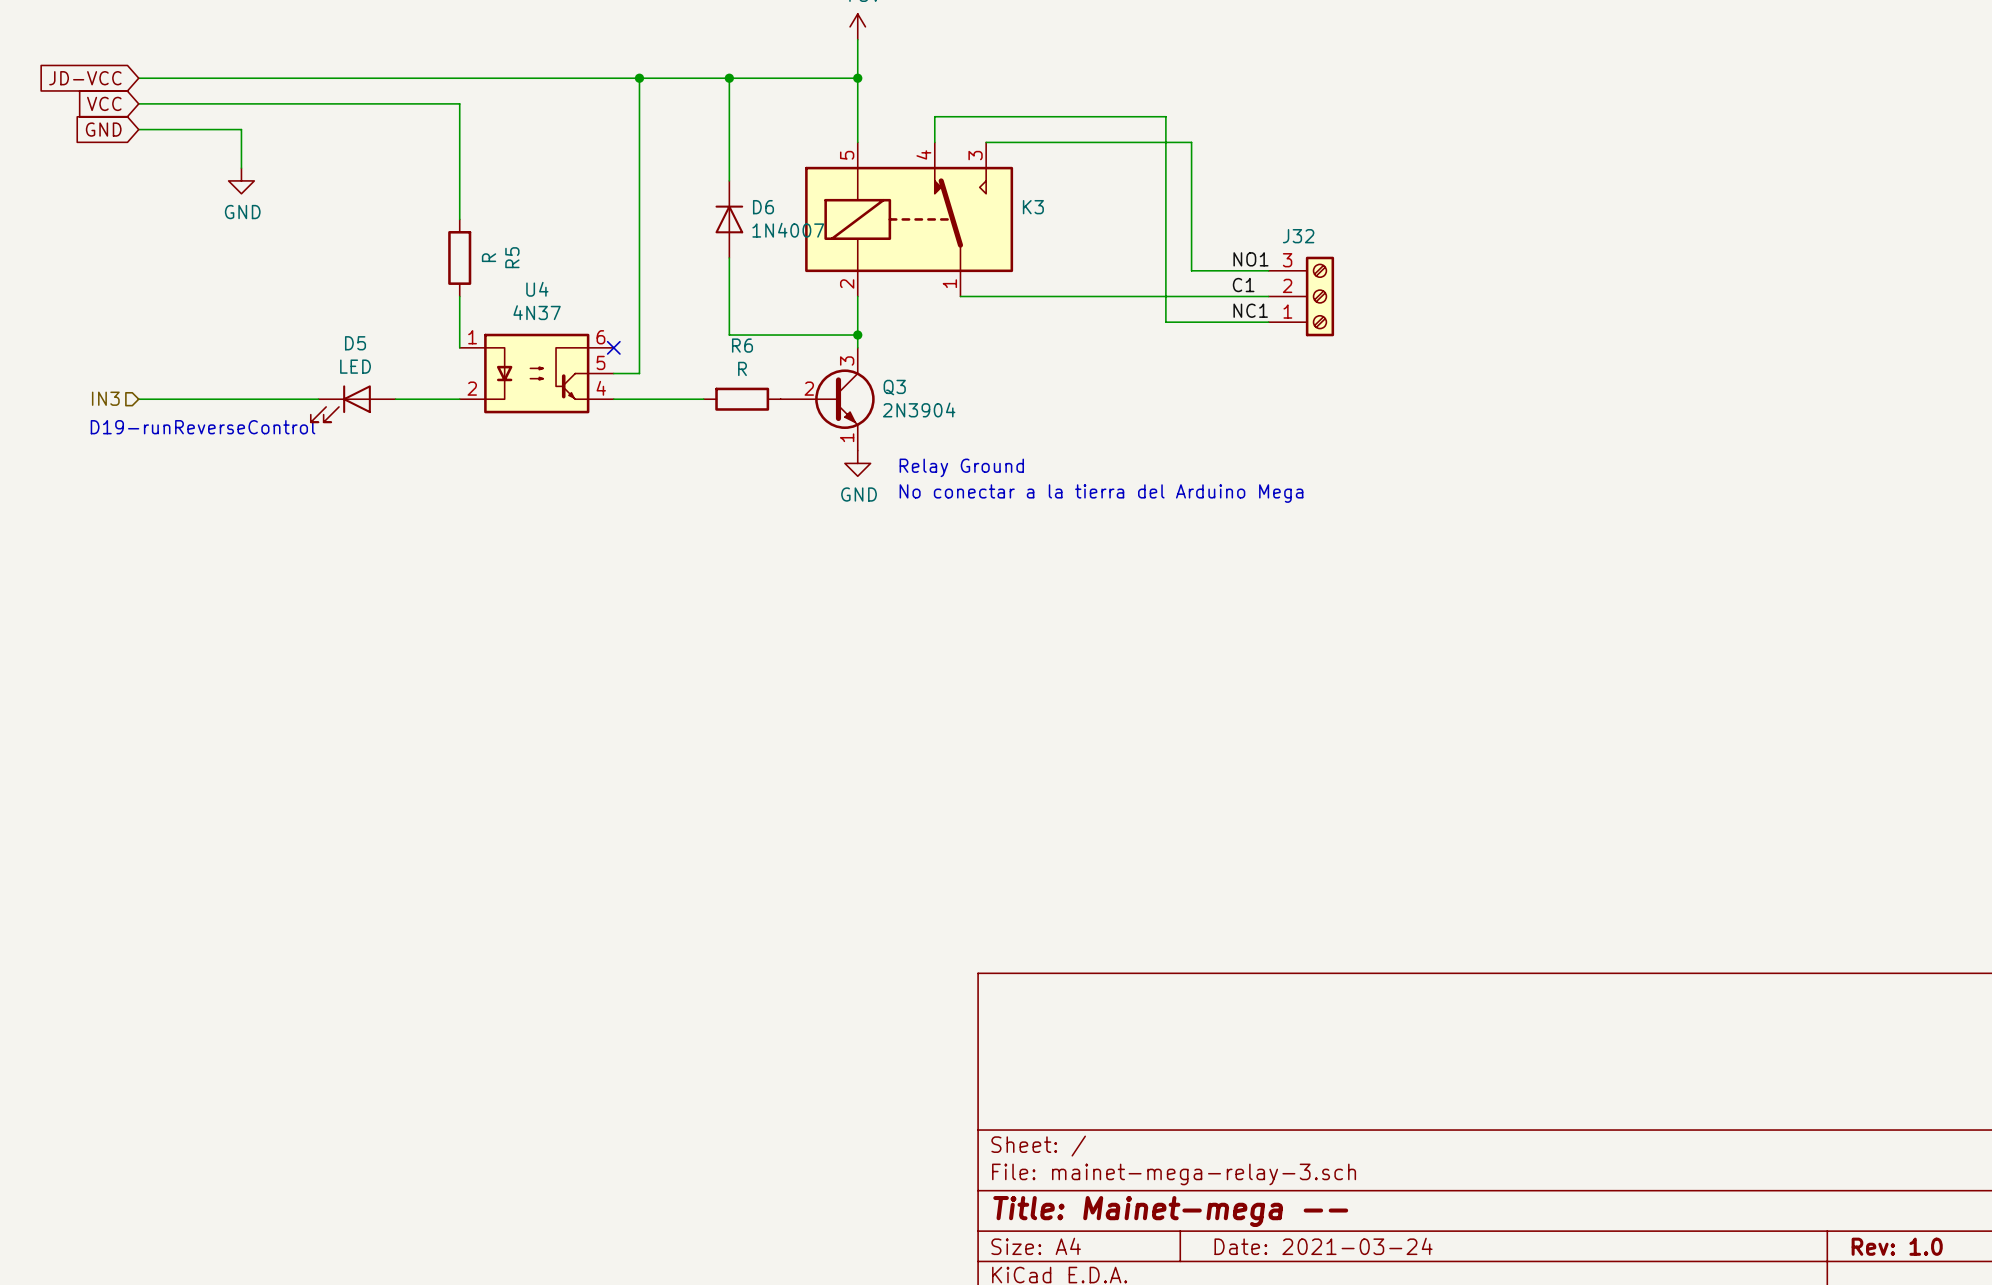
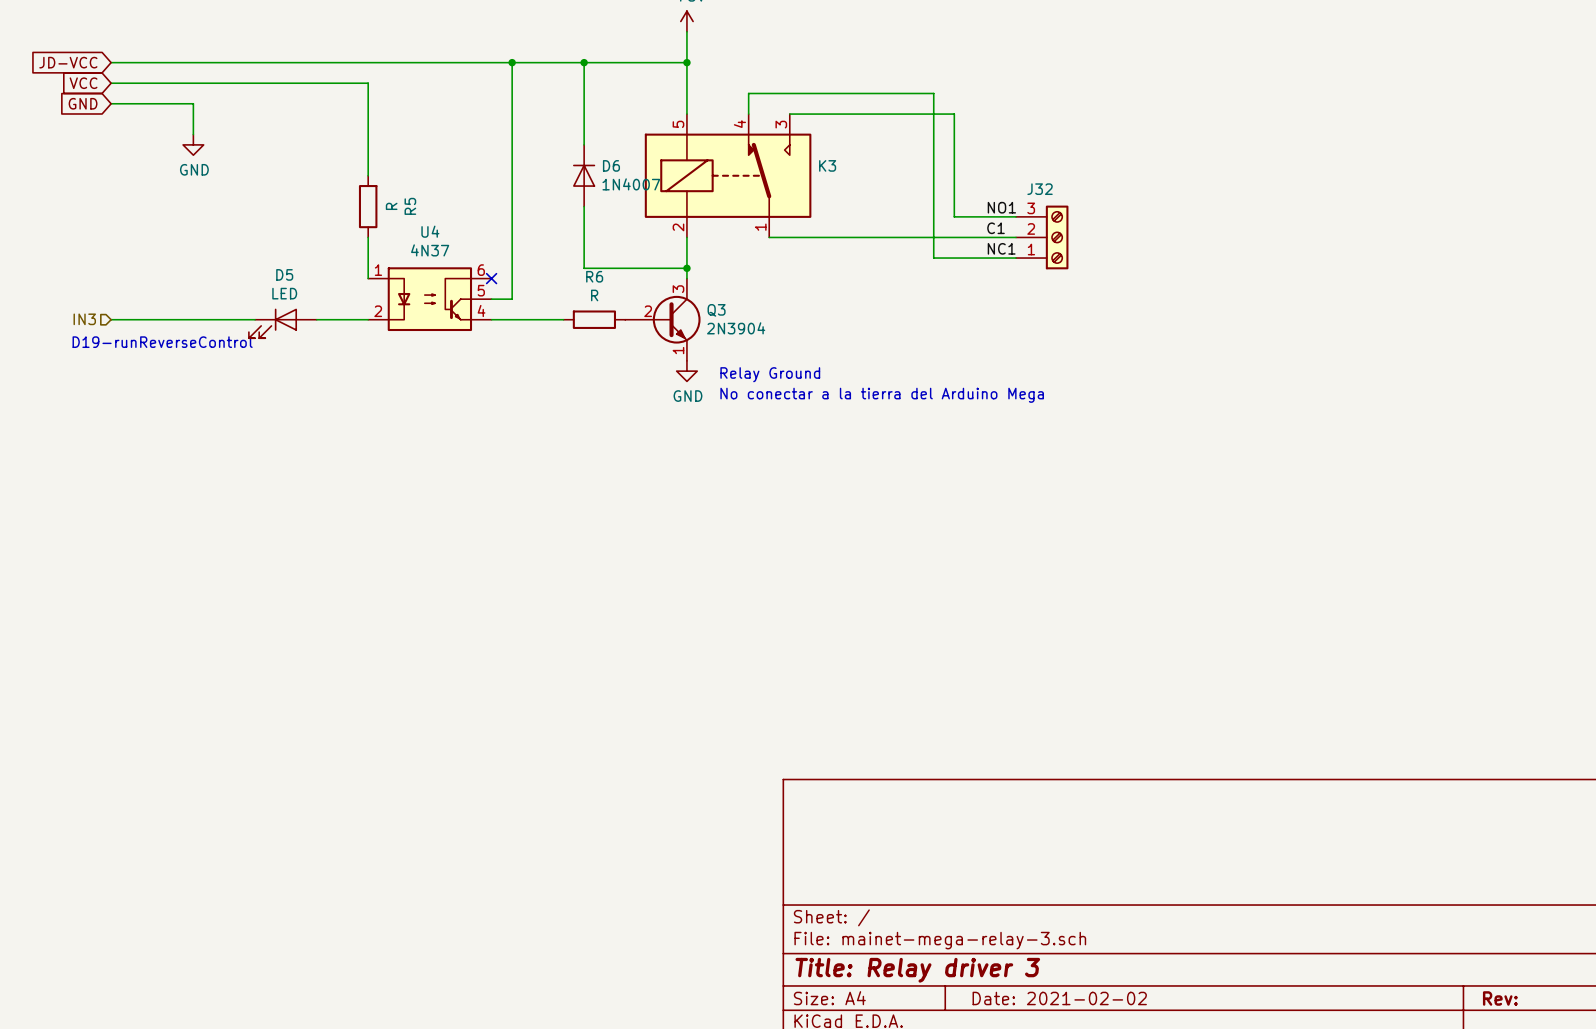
title block: Title: Mainet-mega -- (1170, 1211) -> Title: Relay driver 3 (917, 970)
title block: Date: 2021-03-24 (1323, 1246) -> Date: 2021-02-02 (1059, 998)
title block: Rev: 1.0 (1897, 1246) -> Rev: (1500, 998)

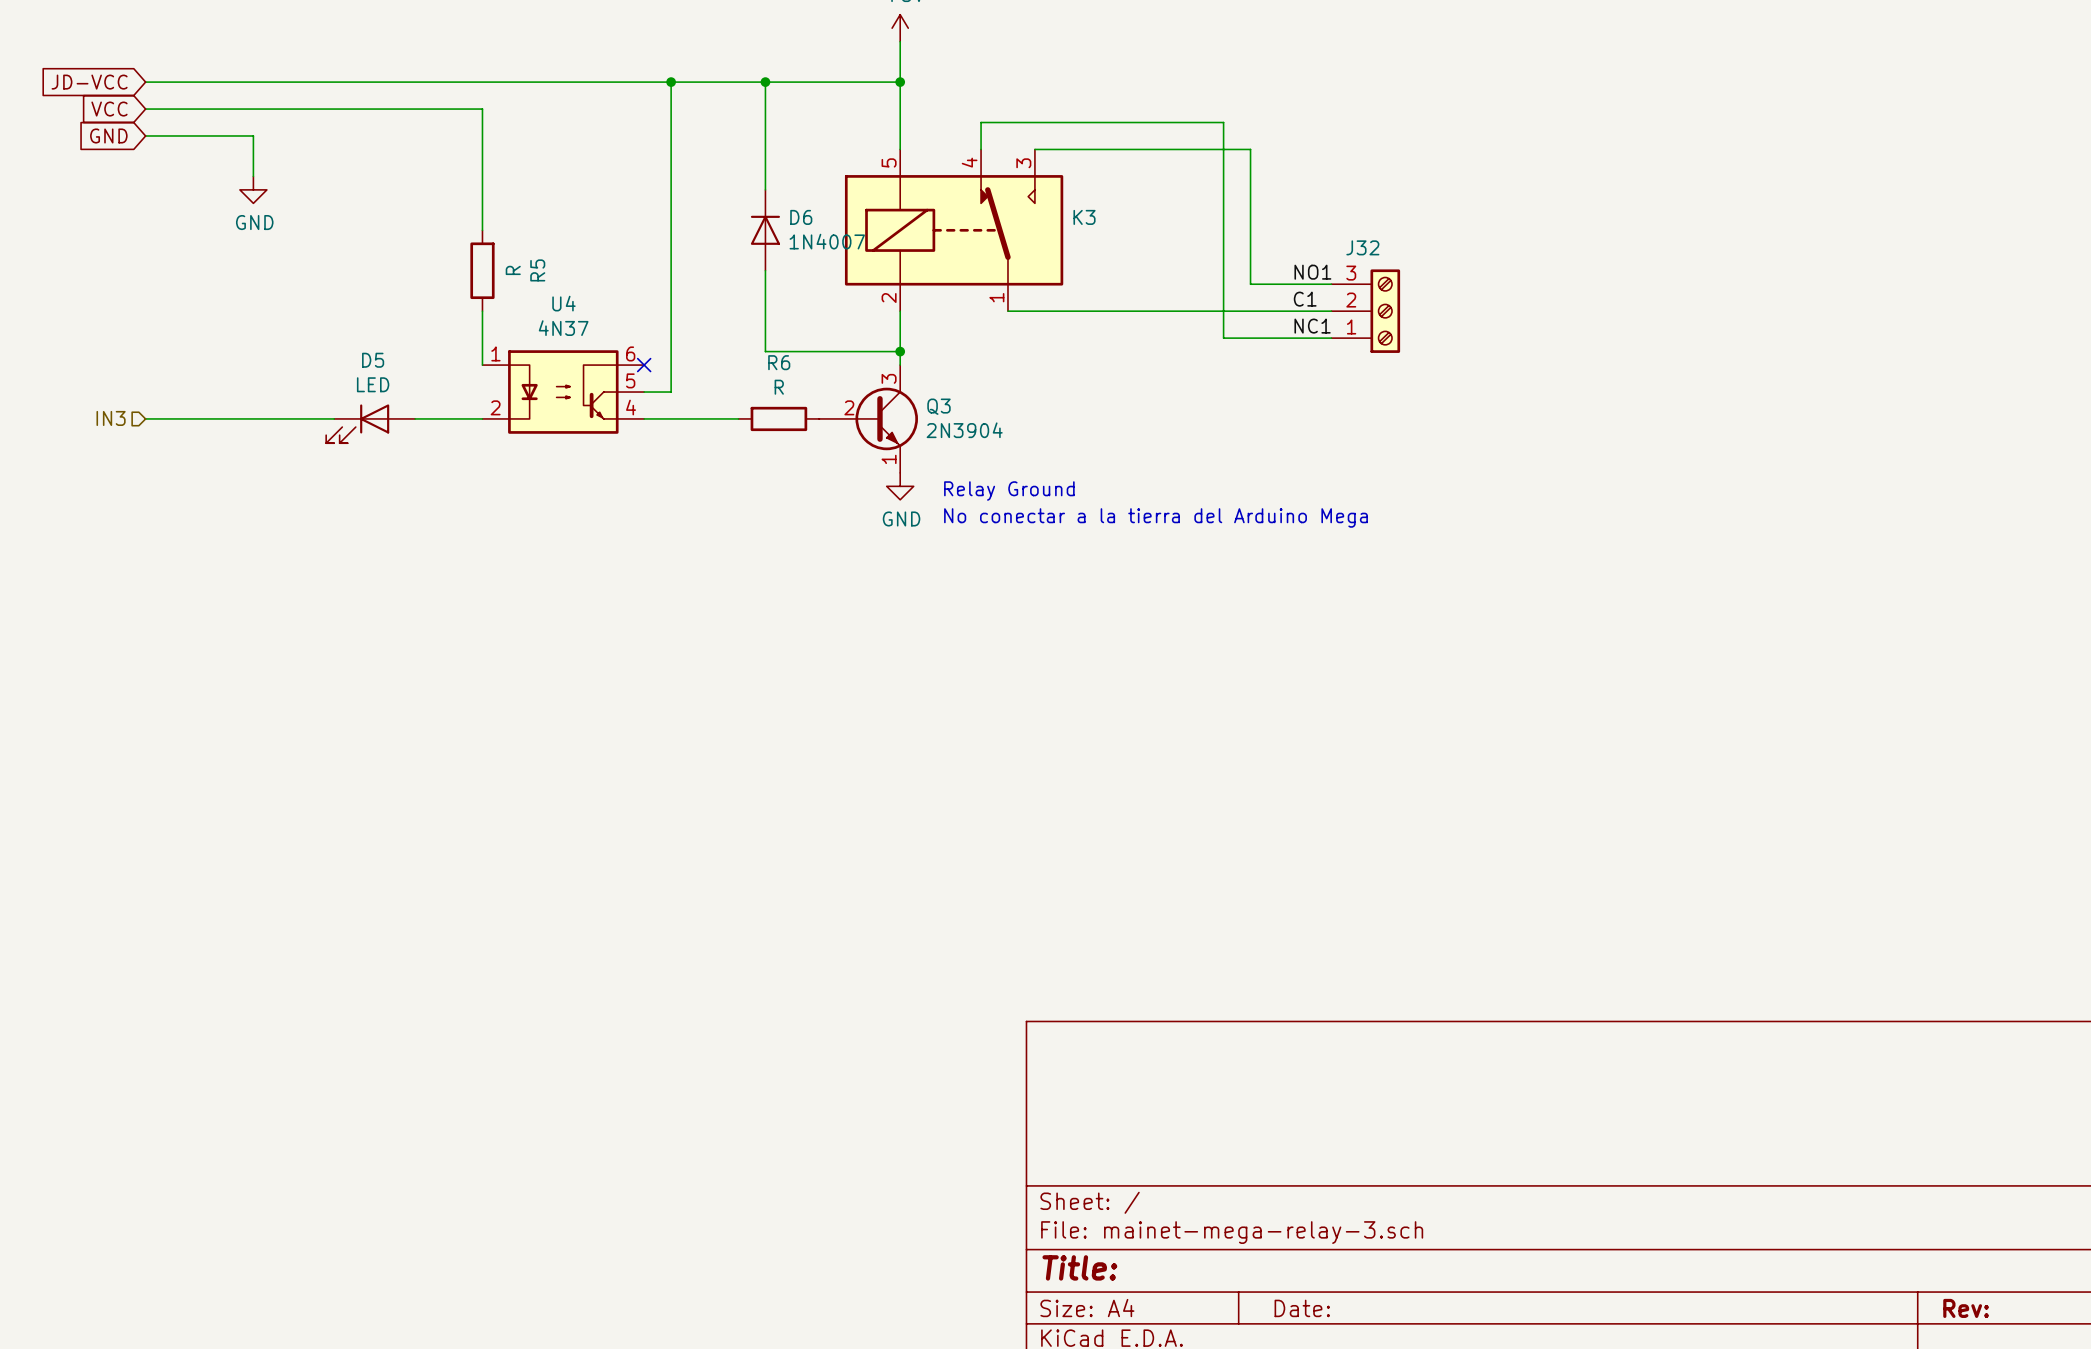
text: D19-runReverseControl (162, 342) -> none
title block: Title: Relay driver 3 (917, 970) -> Title: (1079, 1267)
title block: Date: 2021-02-02 (1059, 998) -> Date: (1302, 1308)

